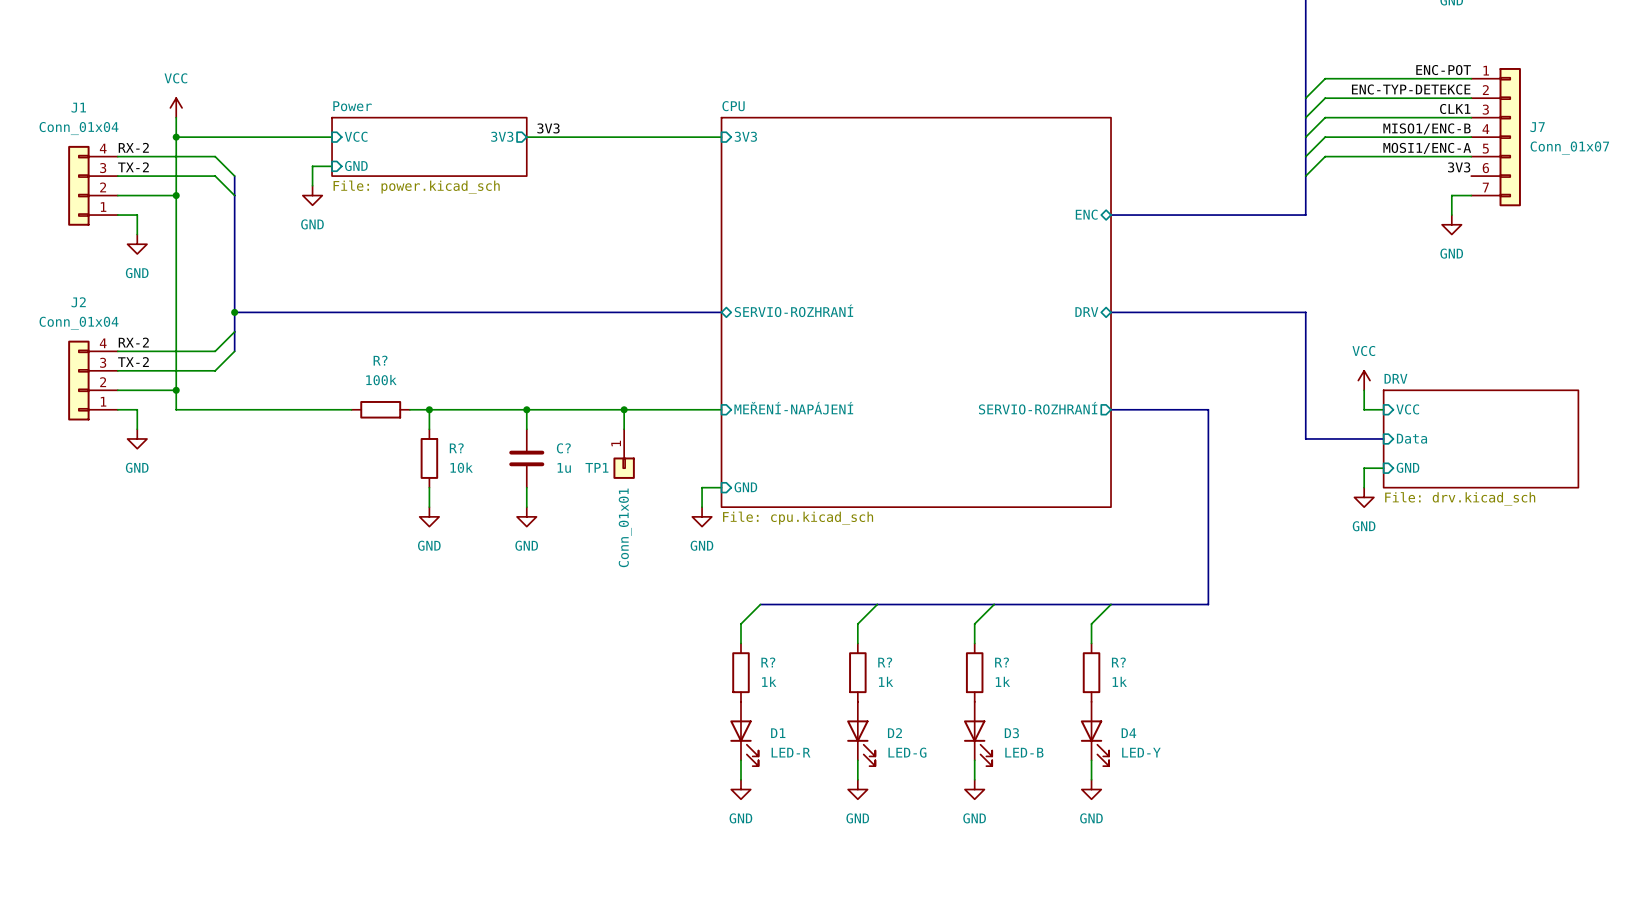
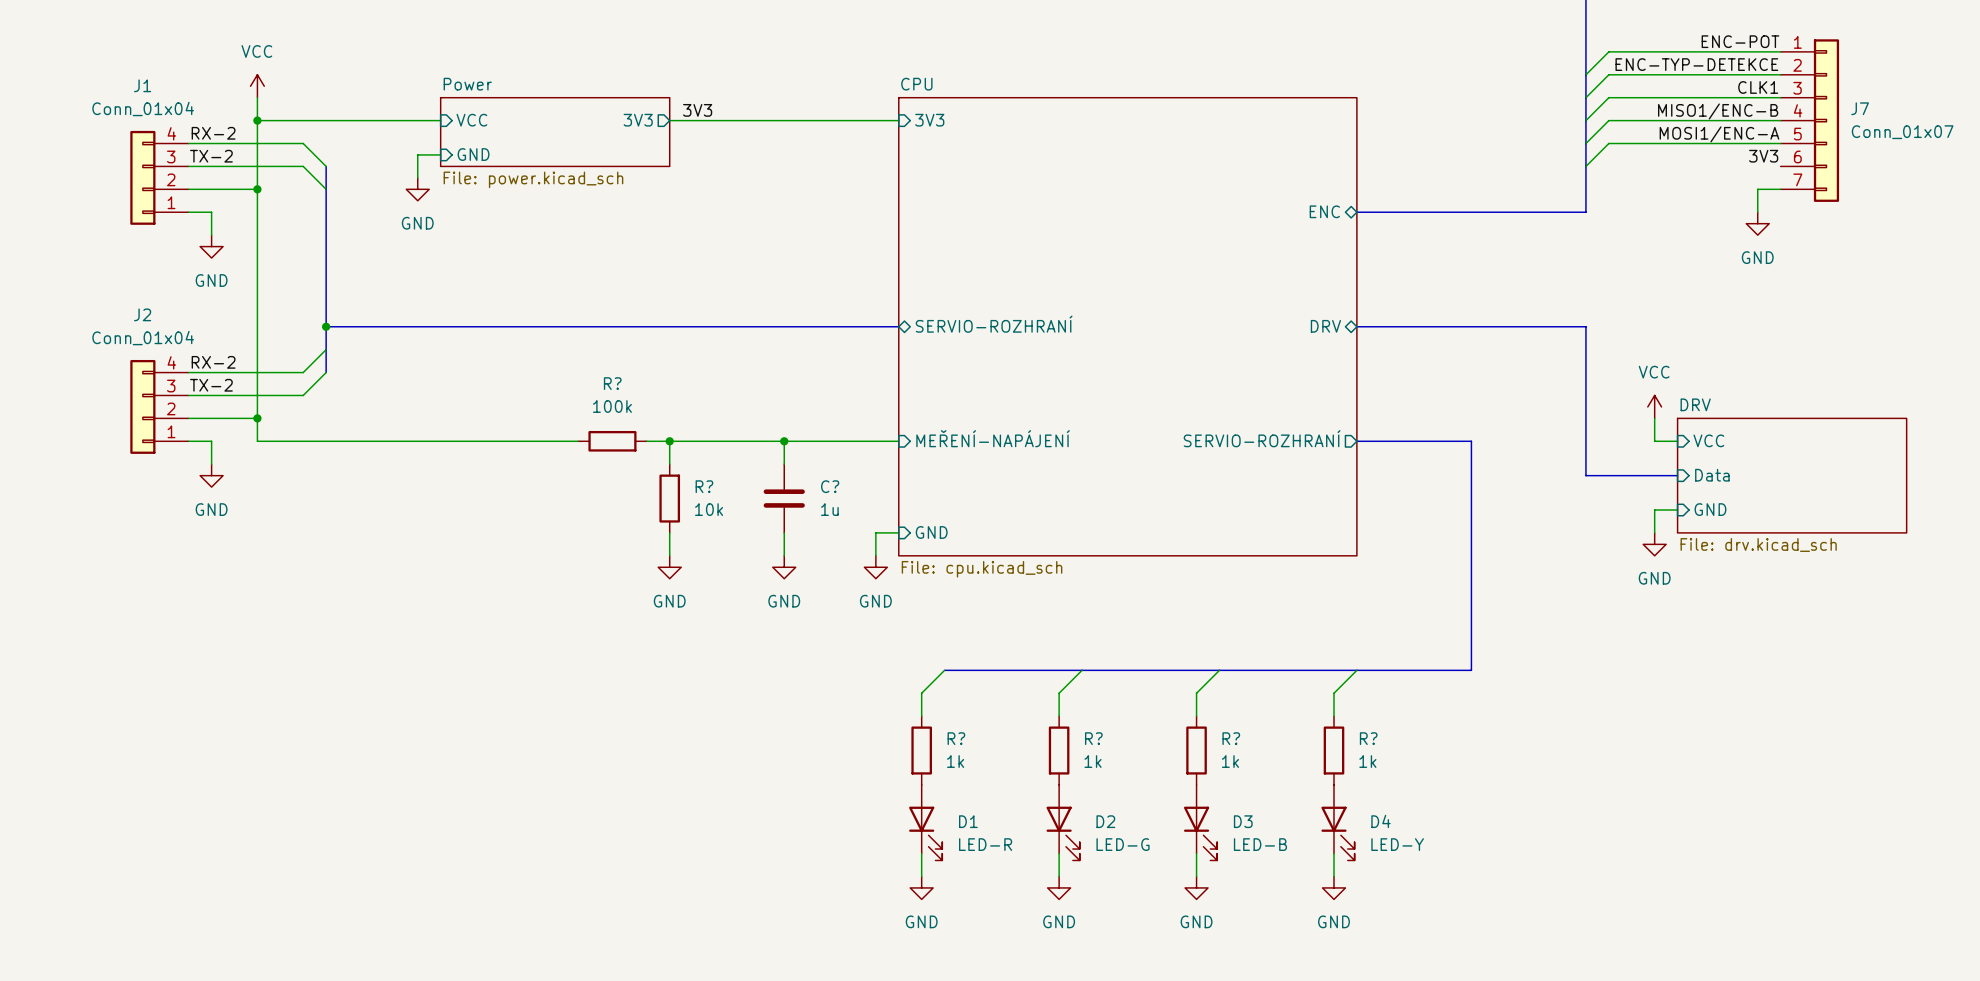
R? position: (380, 409) -> (612, 441)
wire: (429, 409) (429, 429) -> none
junction: (429, 409) -> none
wire: (448, 409) (507, 409) -> (463, 441) (532, 441)
TP1: Conn_01x01 (624, 454) -> none
R? position: (429, 458) -> (669, 498)
C? position: (526, 458) -> (784, 498)
wire: (429, 487) (429, 507) -> none
wire: none -> (784, 532) (784, 555)
power symbol: GND (429, 516) -> none
power symbol: none -> GND (784, 567)

